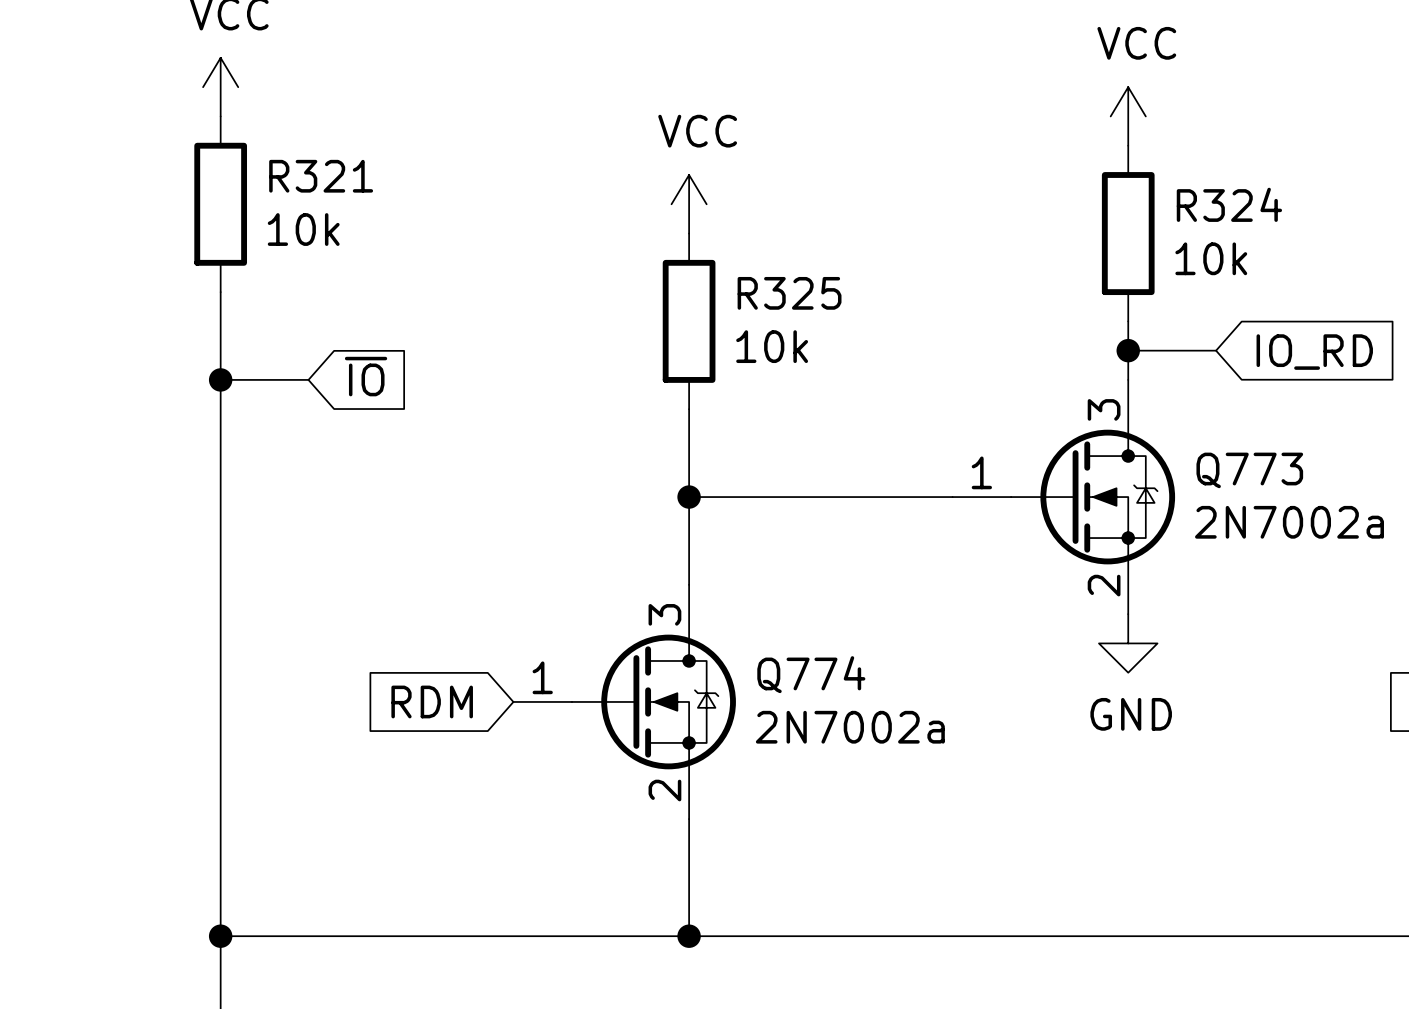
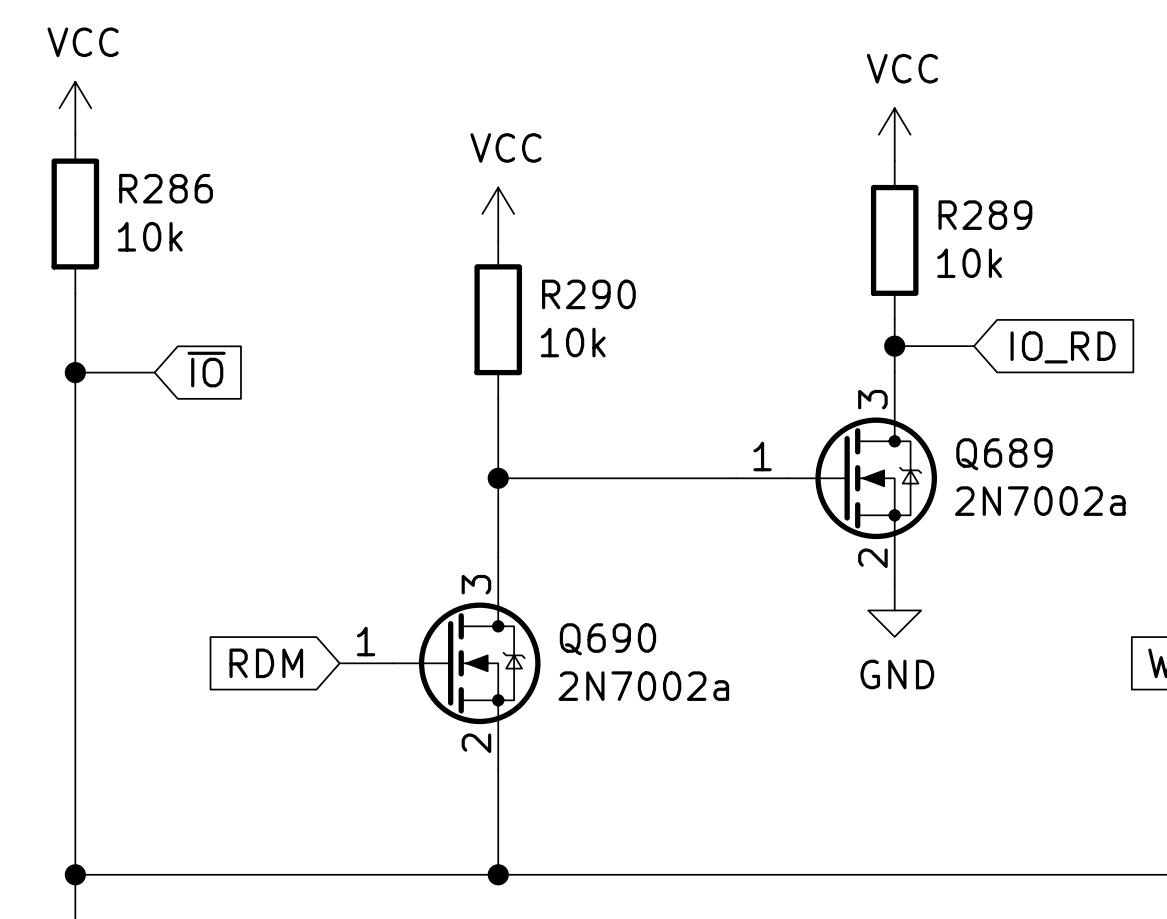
R321 name: R321 (321, 176) -> R286 (166, 188)
R324 name: R324 (1229, 204) -> R289 (985, 215)
R325 name: R325 (789, 293) -> R290 (588, 294)
Q773 name: Q773 (1249, 470) -> Q689 (1004, 454)
Q774 name: Q774 (811, 674) -> Q690 (607, 639)

